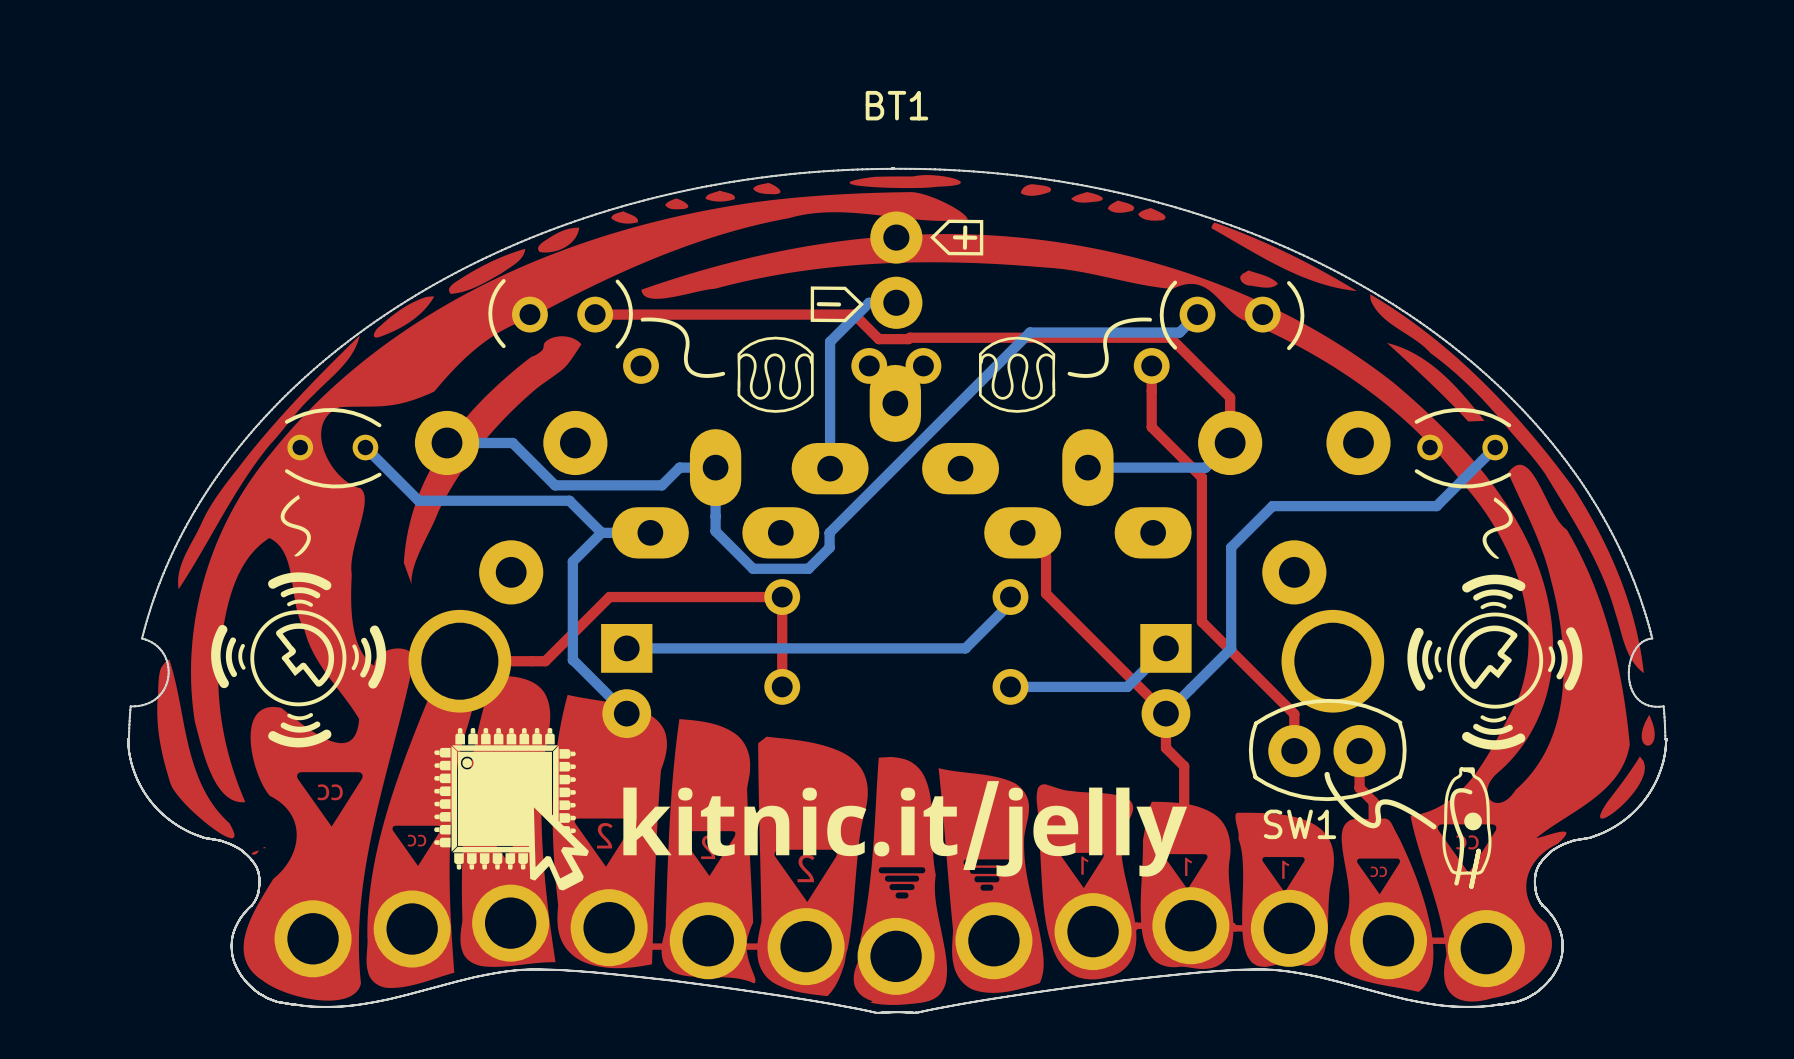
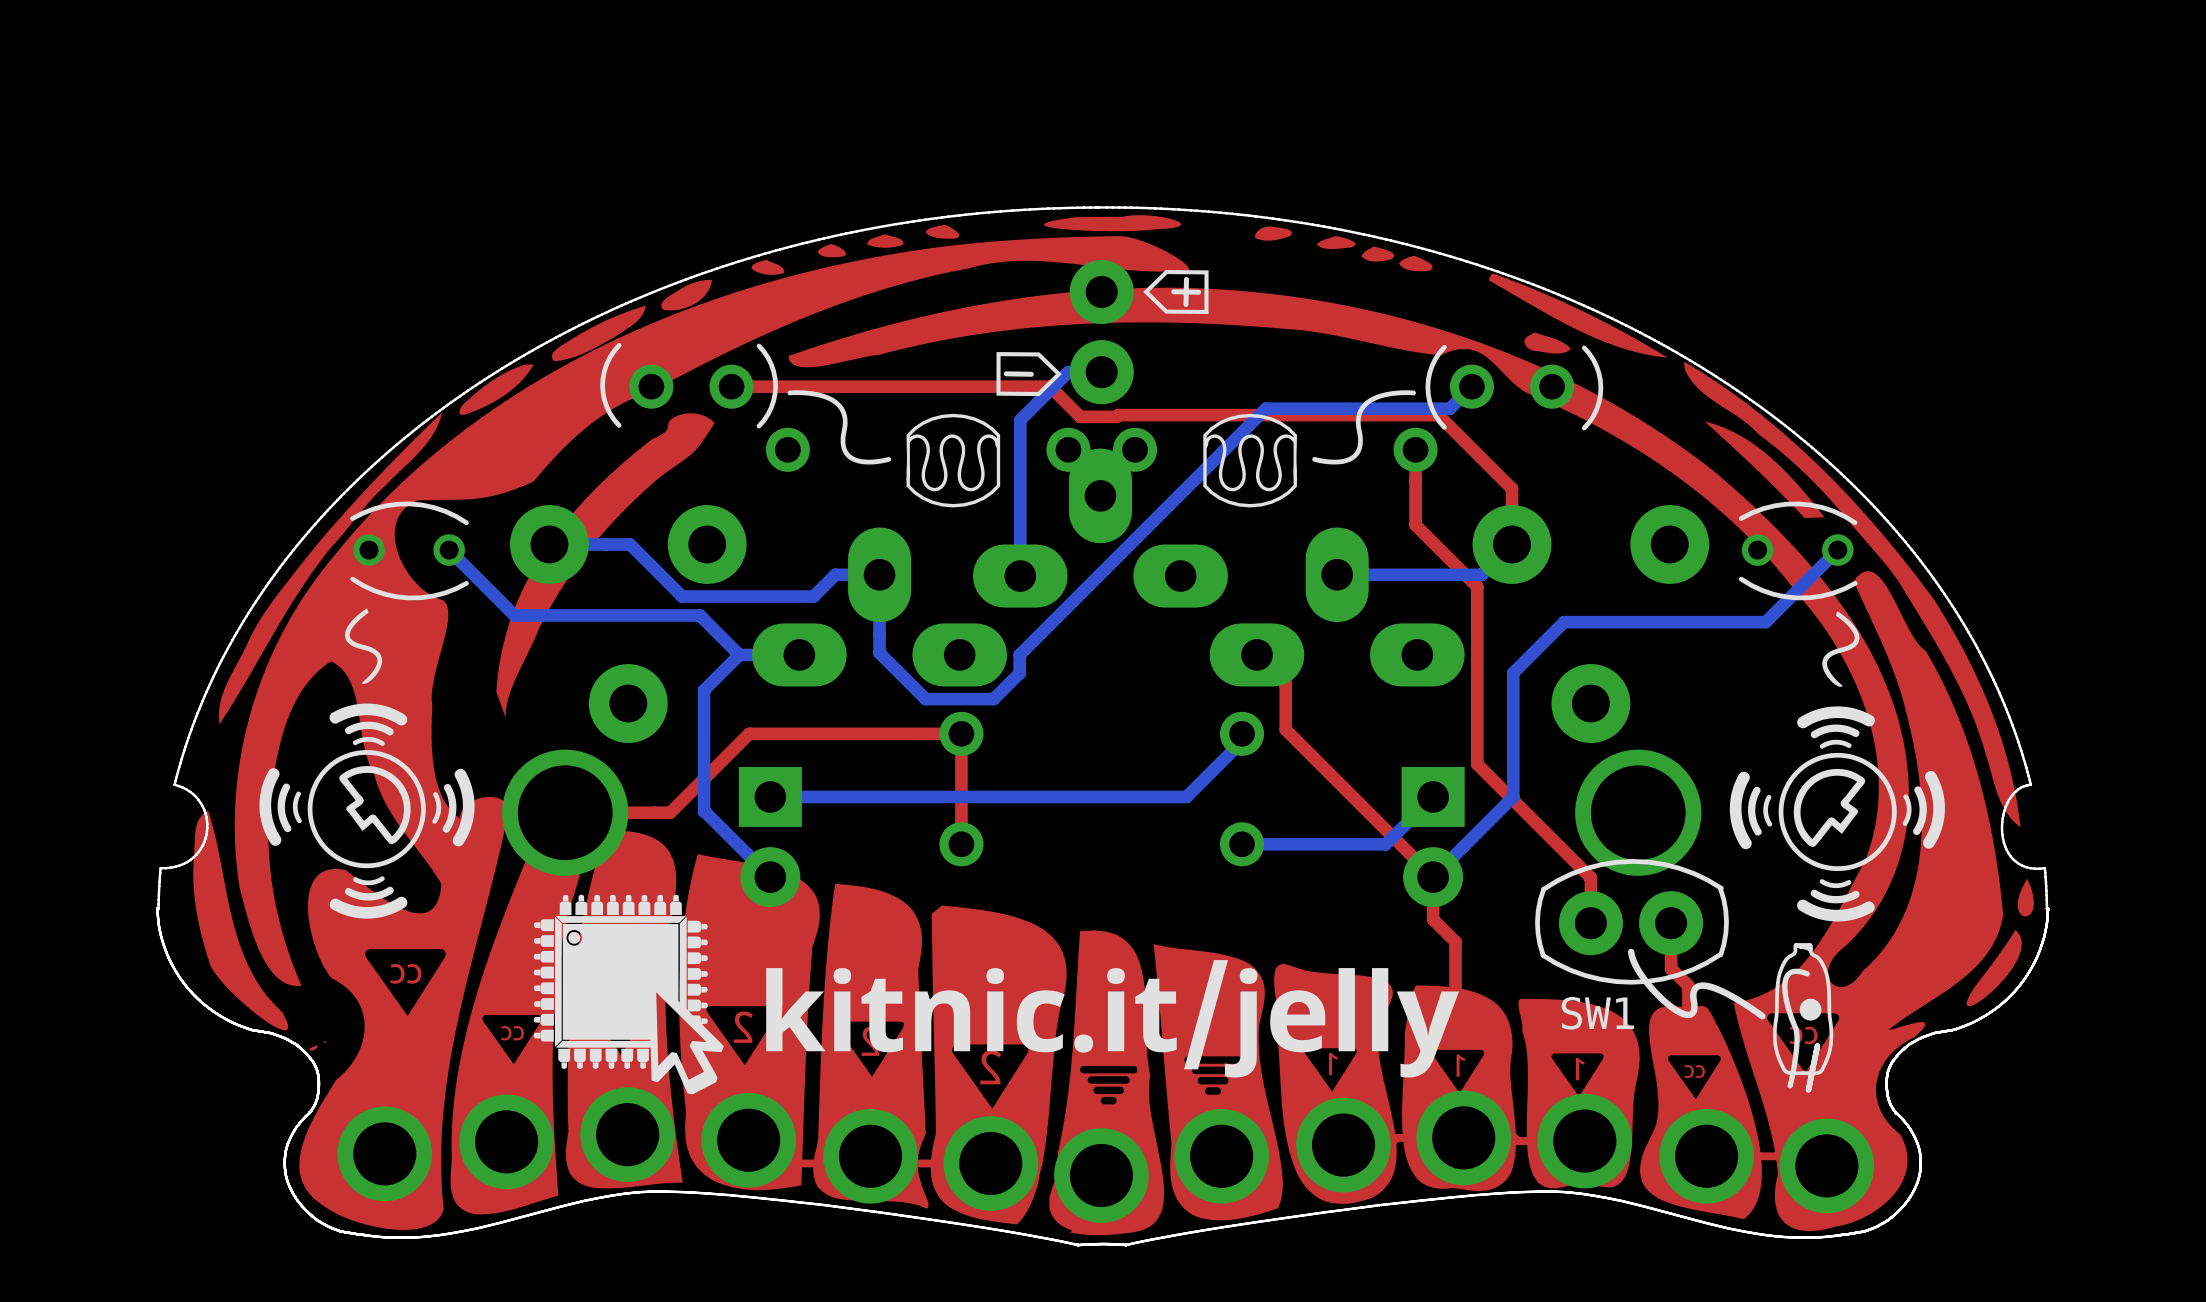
BT1 name: BT1 (896, 105) -> none

